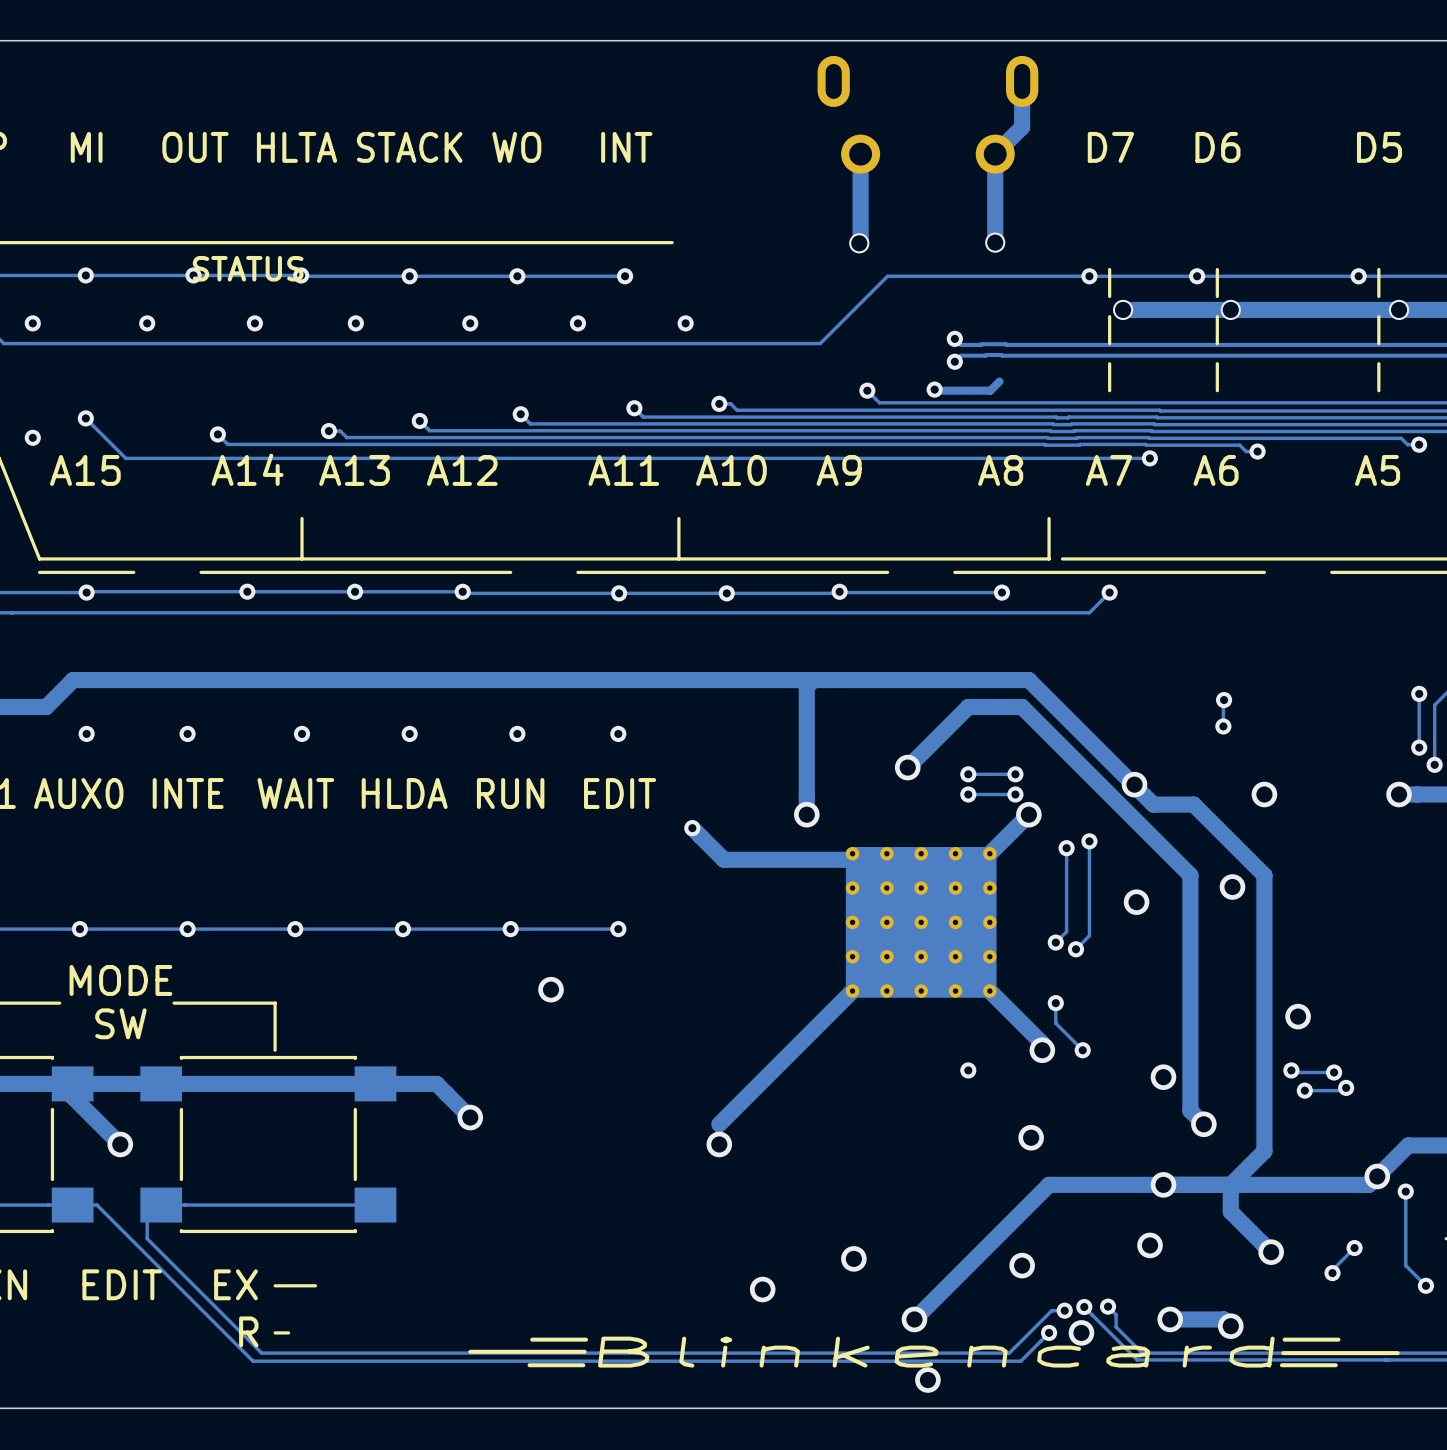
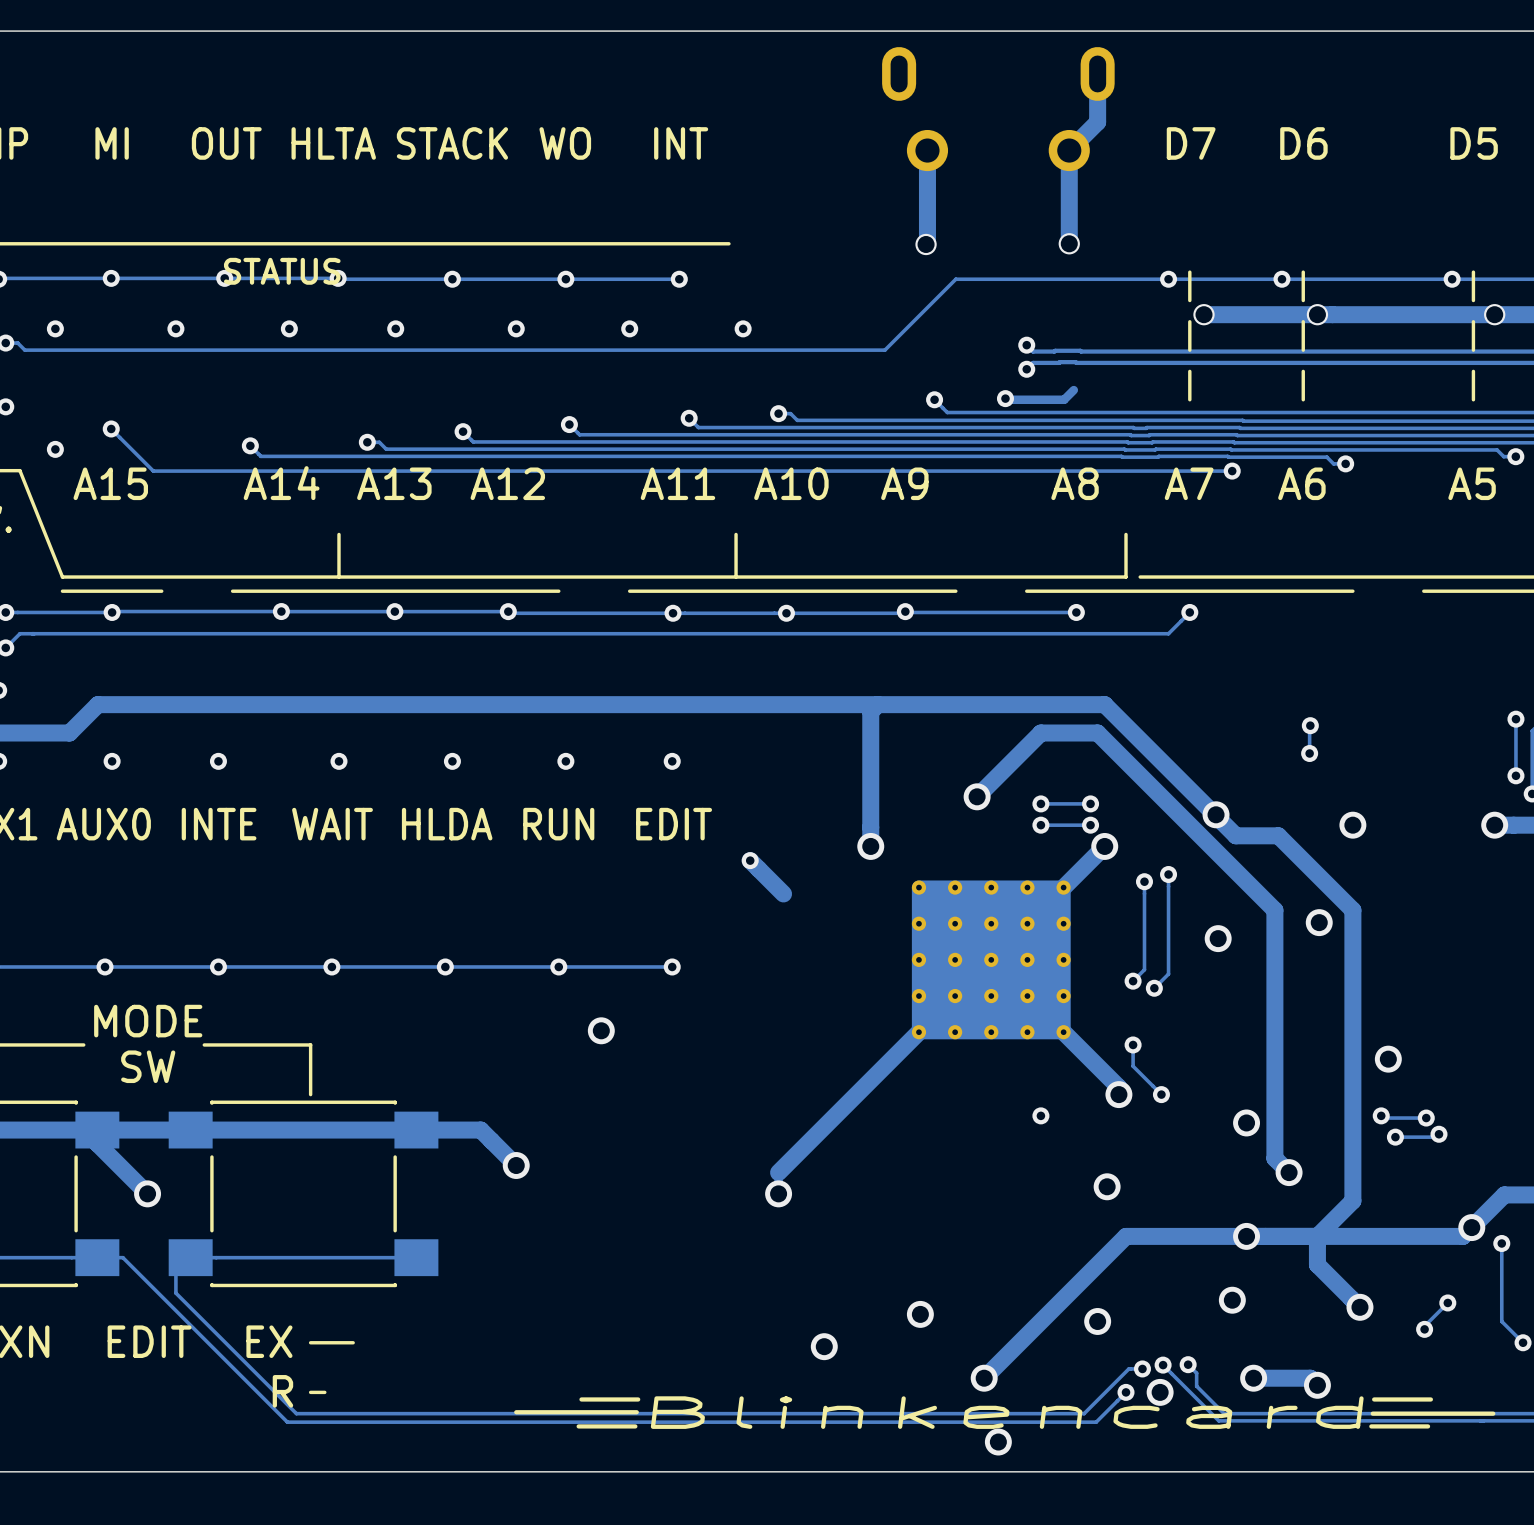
track: (858, 859) (724, 859) -> none

